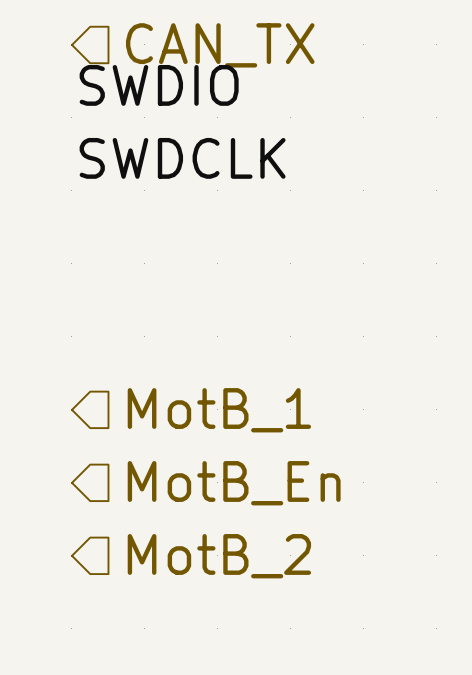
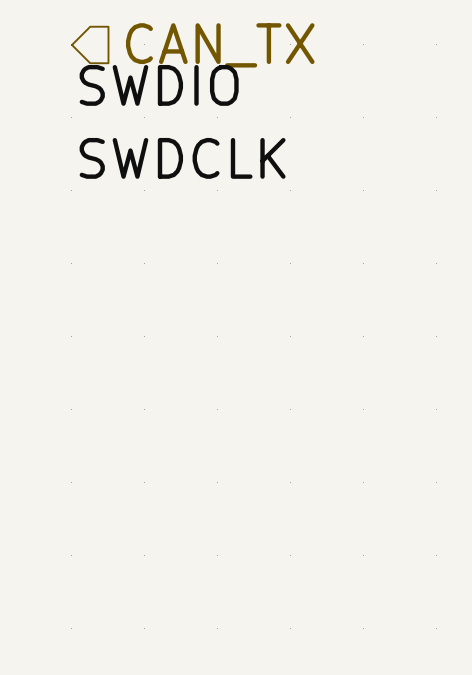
hierarchical label: MotB_1 (219, 410) -> none
hierarchical label: MotB_En (234, 483) -> none
hierarchical label: MotB_2 (219, 556) -> none

